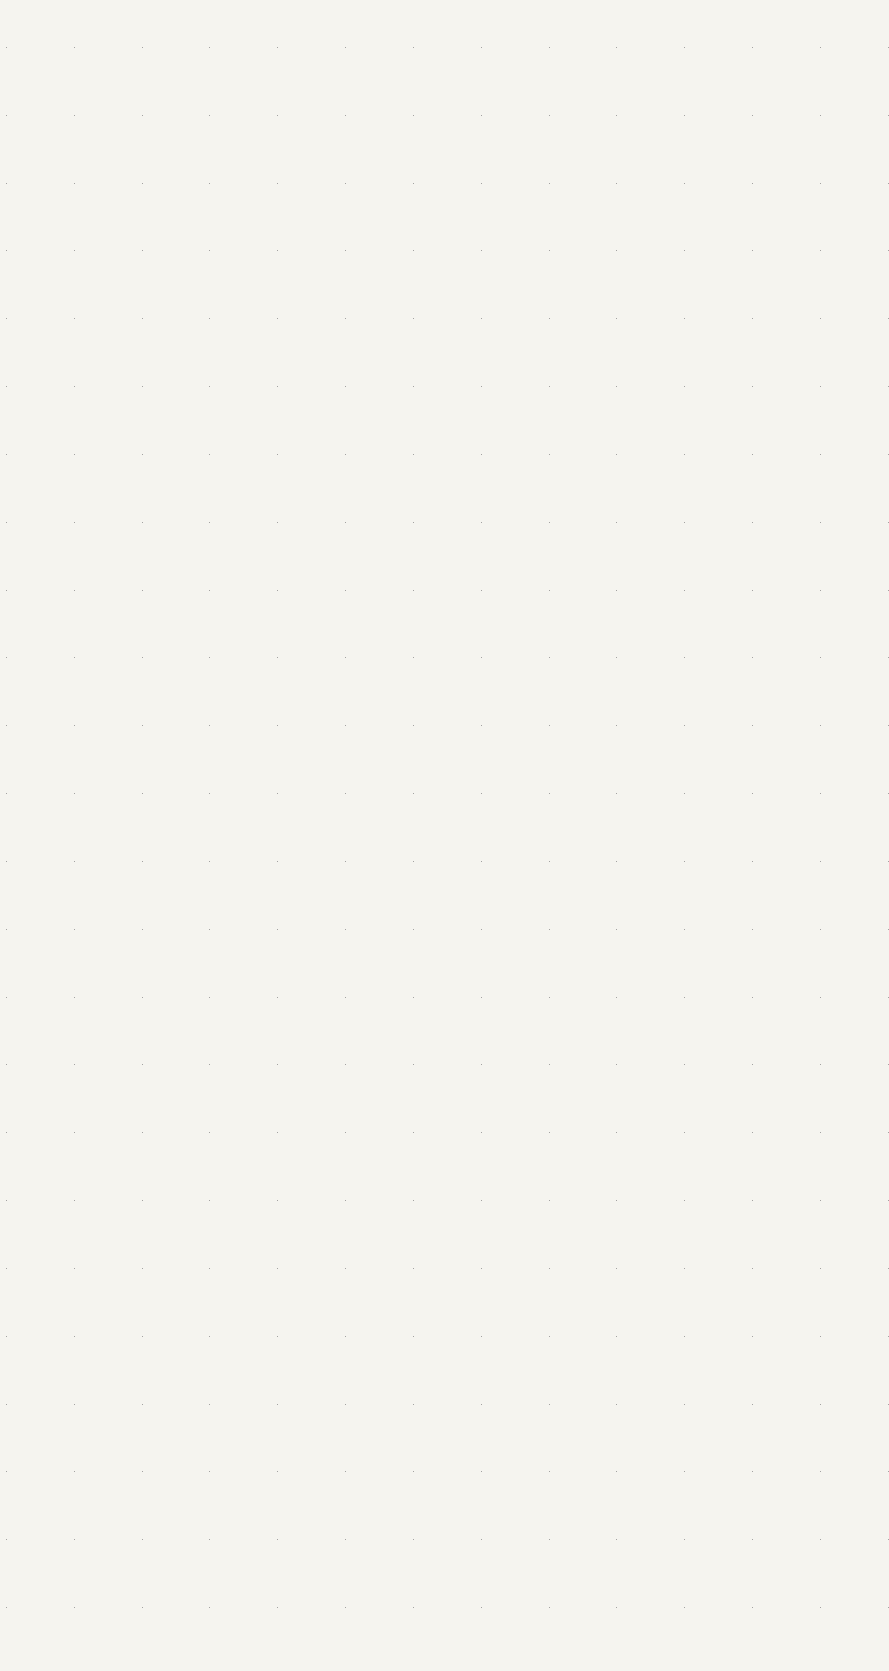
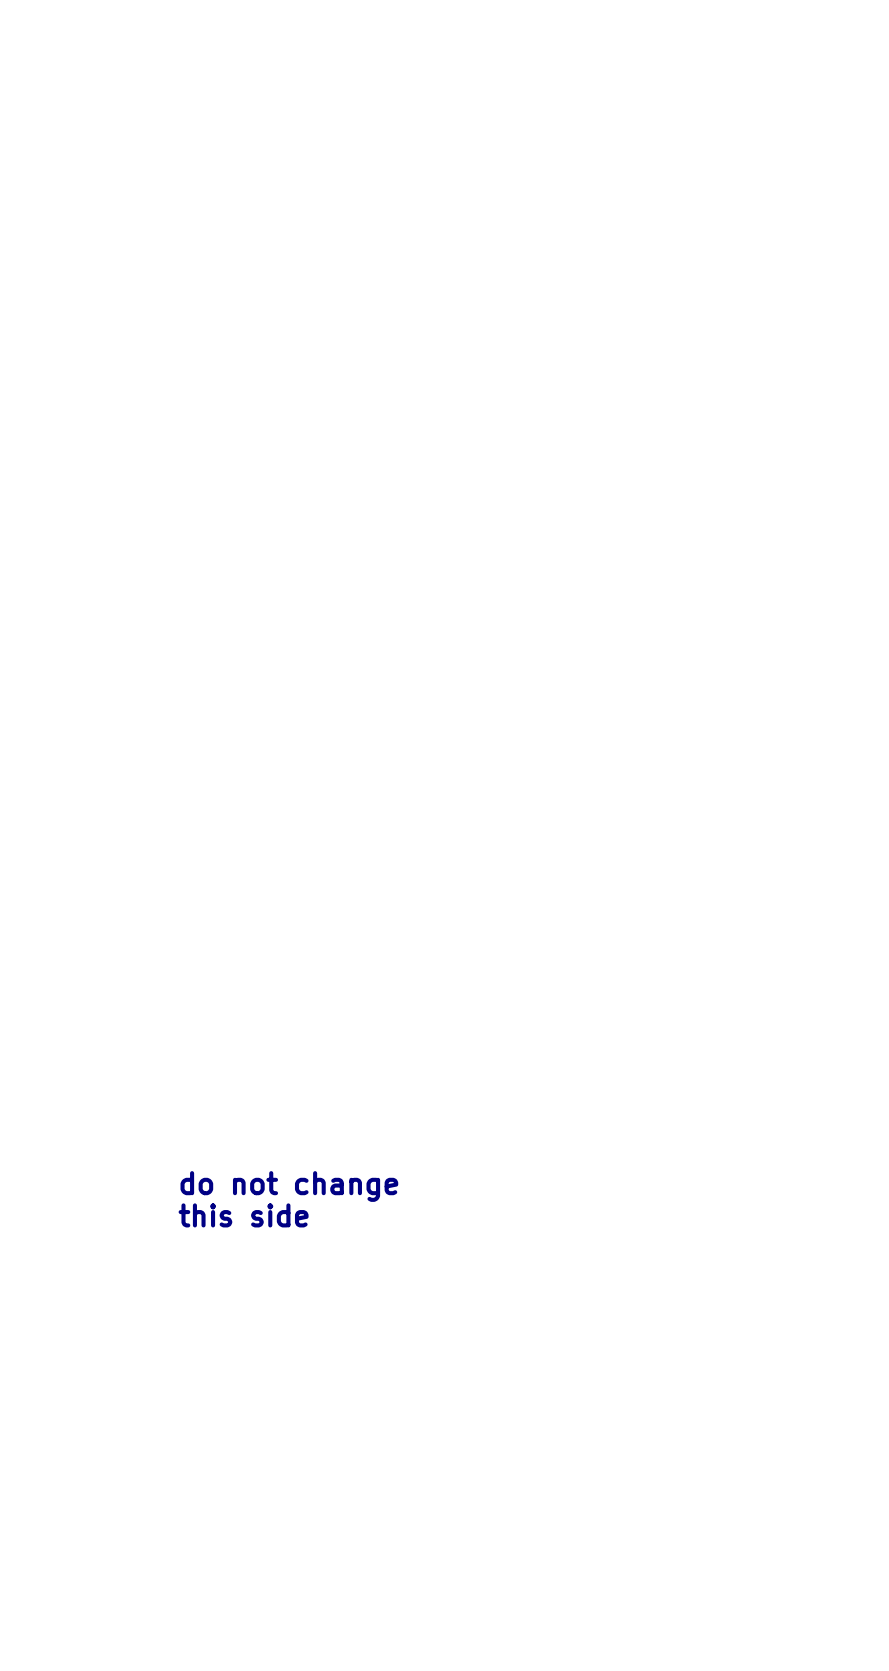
text: none -> do not change (289, 1186)
text: none -> this side (243, 1215)

